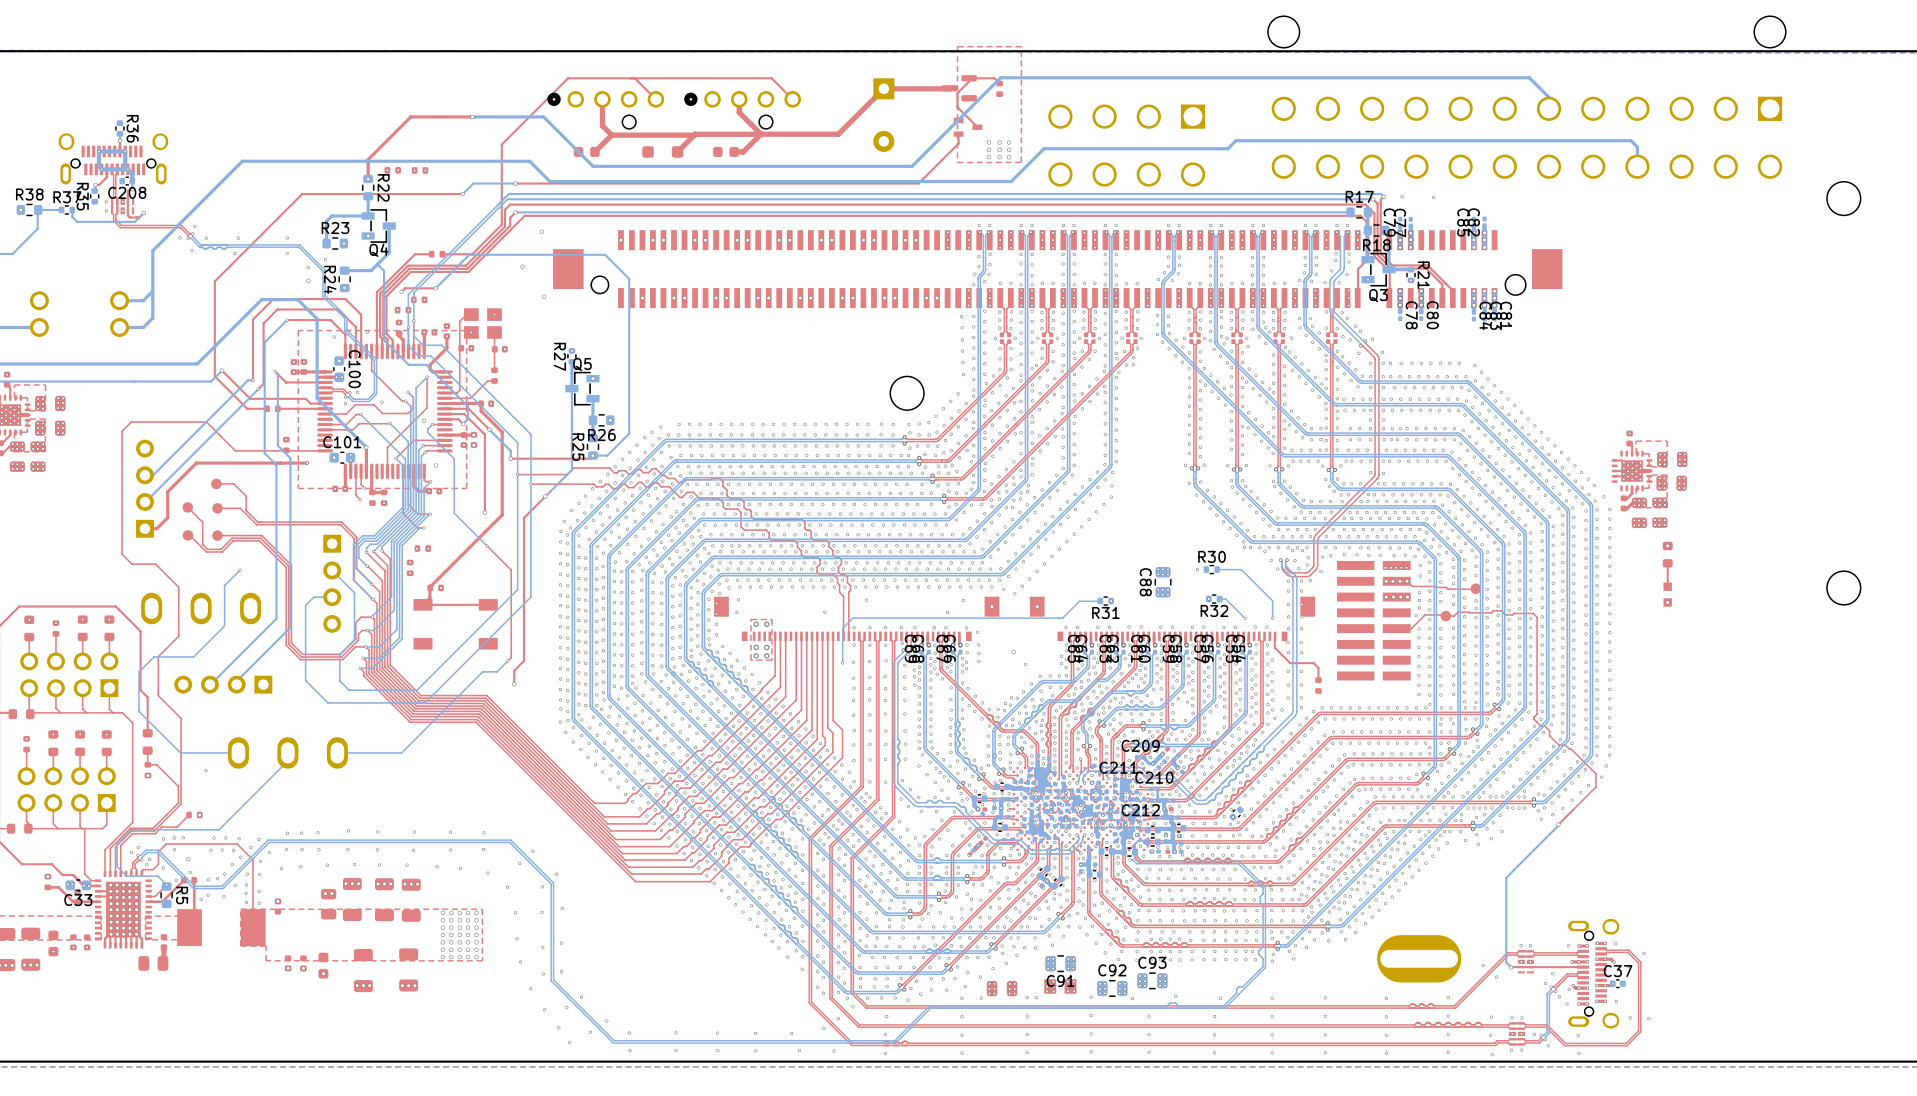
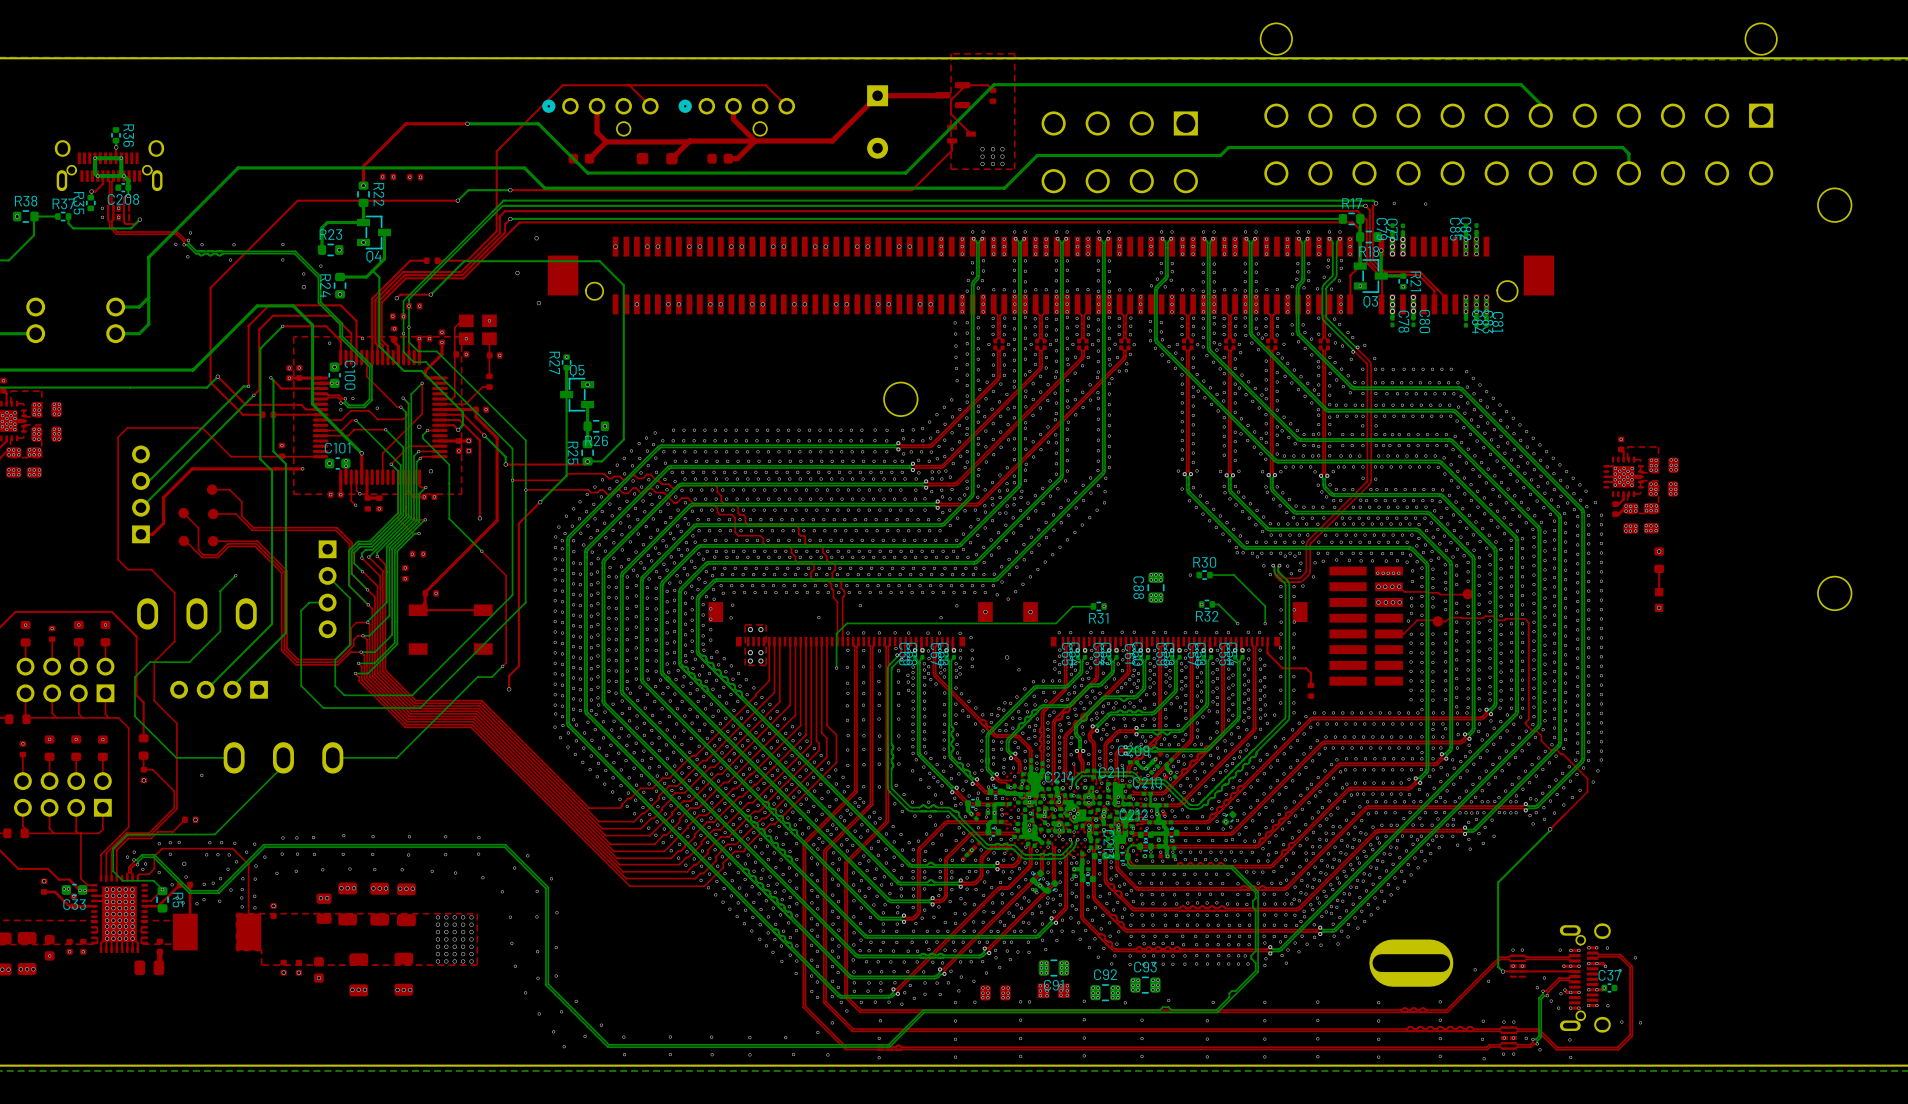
C214: none -> (1059, 788)
C213: none -> (1097, 844)

